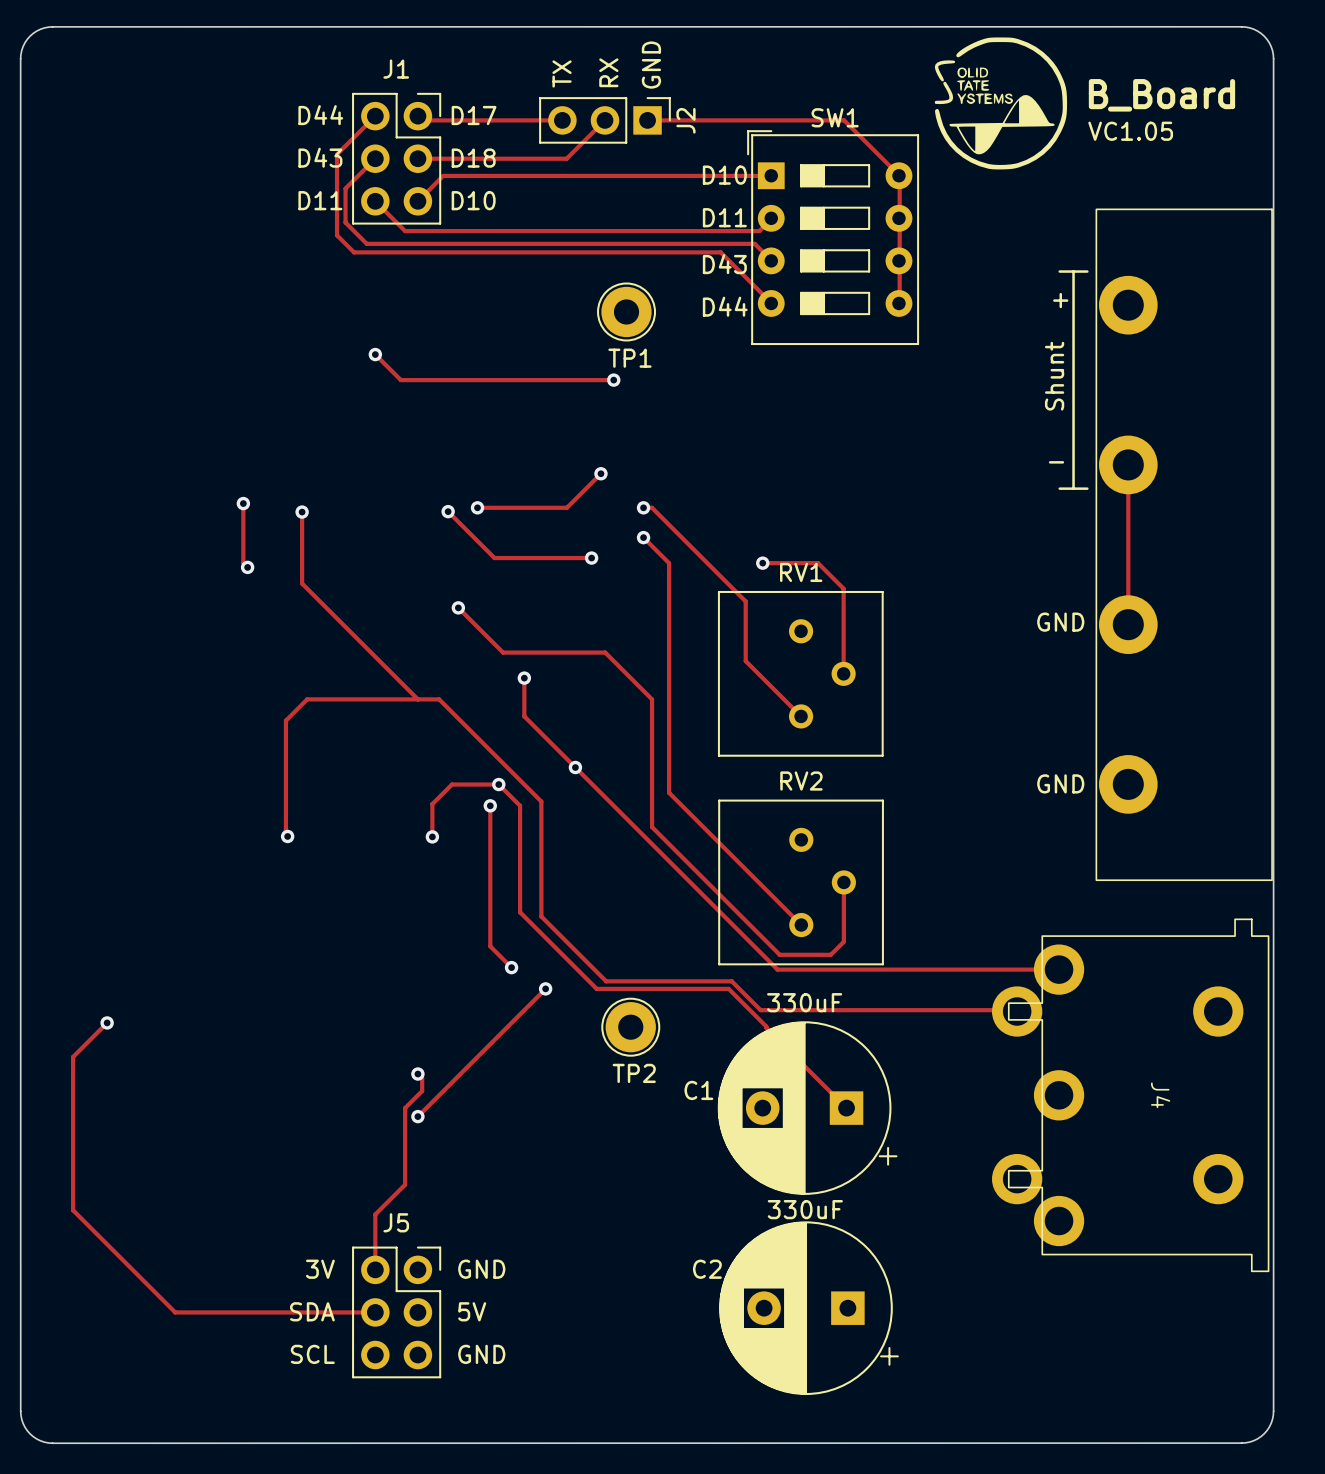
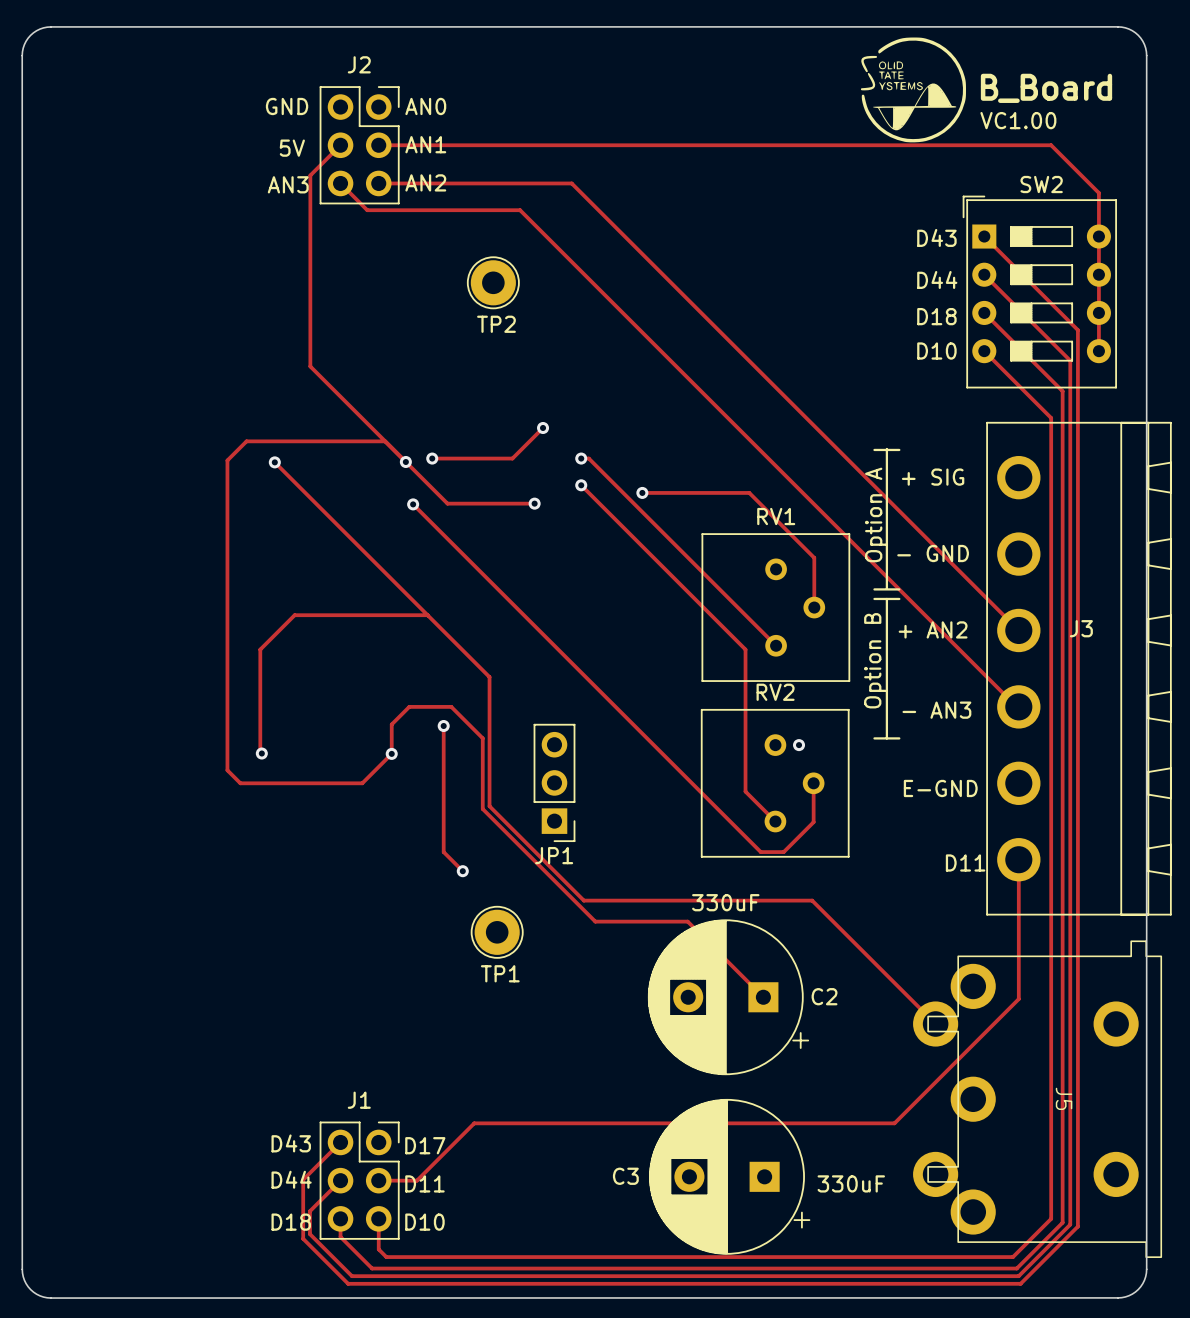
drawing shape: [934, 37, 1068, 170] -> [860, 37, 967, 143]
text rotation: 0° (651, 65) -> 90° clockwise (287, 106)
text position: GND (651, 65) -> GND (287, 106)
J1 name: J1 (396, 69) -> J2 (359, 64)
text: RX (608, 72) -> none
text: TX (562, 73) -> none
text: D44 (320, 115) -> none
text: D17 (474, 115) -> AN0 (425, 106)
track: (375, 116) (337, 154) (337, 235) (354, 252) (720, 252) (771, 303) -> none
track: (417, 116) (422, 120) (562, 120) -> none
track: (604, 120) (566, 158) -> (1098, 351) (1098, 193) (1051, 145) (512, 145)
J2: (604, 120) -> none
track: (647, 120) (844, 120) (899, 175) (899, 303) -> none
text: VC1.05 (1130, 131) -> VC1.00 (1018, 120)
text: D43 (320, 157) -> 5V (292, 148)
text: D18 (473, 158) -> AN1 (425, 144)
text: D10 (724, 175) -> none
track: (771, 175) (443, 175) (417, 201) -> (1018, 630) (571, 183) (378, 183)
track: (345, 188) (345, 222) (366, 243) (754, 243) (771, 261) -> (313, 172) (310, 175) (310, 366) (405, 461)
text: D11 (320, 200) -> AN3 (288, 184)
text: D10 (473, 200) -> AN2 (425, 182)
text: D11 (724, 217) -> none
track: (771, 218) (759, 231) (575, 231) -> (1018, 706) (520, 210)
SW1: (833, 237) -> none
text position: D43 (724, 264) -> D43 (936, 237)
line: (1059, 271) (1087, 271) -> (874, 589) (899, 589)
line: (1073, 271) (1073, 488) -> none
text: + (1060, 300) -> none
text position: D44 (725, 306) -> D44 (937, 279)
TP1 position: (626, 311) -> (497, 932)
SW2: none -> (1039, 292)
track: none -> (984, 312) (1062, 391) (1062, 1222) (1016, 1268) (372, 1268) (340, 1236) (340, 1218)
text: none -> D18 (936, 316)
track: (375, 354) (400, 380) (613, 380) -> none
via: (375, 354) -> none
text: Shunt (1054, 376) -> none
via: (613, 380) -> none
text: none -> D10 (936, 351)
track: none -> (984, 351) (1051, 418) (1051, 1218) (1012, 1257) (386, 1257) (378, 1249) (378, 1218)
text: - (1056, 462) -> none
track: (1128, 464) (1128, 624) -> none
track: none -> (385, 441) (246, 441) (227, 460) (227, 770) (240, 783) (362, 783) (391, 753)
line: (1059, 488) (1087, 488) -> (874, 449) (899, 449)
line: none -> (886, 449) (886, 588)
track: (243, 503) (243, 563) (247, 567) -> none
via: (243, 503) -> none
track: (302, 512) (302, 583) (417, 699) -> (274, 462) (489, 677) (489, 722)
text: none -> + SIG (933, 477)
part: (1184, 544) -> none
track: none -> (642, 492) (749, 492) (814, 557) (814, 607)
track: none -> (413, 504) (760, 852) (783, 852) (813, 822) (813, 783)
track: (669, 563) (669, 792) (801, 925) -> (604, 508) (745, 649) (745, 791) (775, 821)
track: (762, 563) (818, 563) (843, 588) (843, 673) -> none
via position: (762, 563) -> (642, 492)
via: (247, 567) -> none
text: none -> Option A (876, 514)
track: (745, 601) (745, 661) (801, 716) -> (672, 542) (776, 645)
track: (458, 607) (503, 652) (605, 652) (652, 699) (652, 827) (779, 954) (830, 954) (843, 941) (843, 882) -> none
via position: (458, 607) -> (413, 504)
text: GND (1060, 622) -> - GND (933, 553)
line: none -> (874, 598) (899, 598)
line: none -> (886, 598) (886, 738)
RV1 position: (800, 673) -> (775, 607)
track: (524, 678) (524, 716) (777, 969) (1059, 969) -> none
via: (524, 678) -> none
text: none -> + AN2 (933, 629)
track: (307, 699) (439, 699) (541, 801) -> (279, 630) (294, 615) (427, 615)
text: none -> Option B (875, 660)
J3: none -> (1078, 668)
via: (575, 767) -> none
text: GND (1060, 783) -> none
via: (498, 784) -> none
text: none -> - AN3 (936, 710)
track: (520, 805) (520, 912) (596, 988) (728, 988) (766, 1027) -> (470, 726) (482, 738) (482, 809) (595, 921) (687, 921) (691, 925)
line: none -> (874, 738) (899, 738)
via: none -> (799, 745)
JP1: none -> (554, 782)
text: none -> E-GND (940, 788)
RV2 position: (801, 882) -> (775, 783)
track: (541, 895) (541, 916) (606, 981) (731, 981) (760, 1010) (1017, 1011) -> (489, 806) (583, 900) (812, 900) (935, 1024)
track: none -> (1018, 859) (1018, 999) (894, 1123) (474, 1123) (416, 1180) (378, 1180)
text: none -> D11 (965, 862)
track: (545, 988) (417, 1116) -> none
via: (545, 988) -> none
track: (107, 1022) (73, 1057) (73, 1210) (175, 1312) (375, 1312) -> (984, 274) (1070, 360) (1070, 1224) (1018, 1276) (352, 1276) (309, 1234) (309, 1211) (340, 1180)
via: (107, 1022) -> none
TP2 position: (630, 1027) -> (493, 282)
track: (417, 1074) (422, 1078) (422, 1091) (405, 1108) (405, 1184) (375, 1214) (375, 1269) -> (984, 236) (1077, 330) (1077, 1226) (1020, 1283) (348, 1283) (303, 1238) (303, 1179) (340, 1142)
via: (417, 1074) -> none
C1 name: C1 (698, 1090) -> C2 (824, 996)
J4: (1130, 1095) -> none
via: (417, 1116) -> none
C2 value position: 330uF (805, 1209) -> 330uF (851, 1183)
J5: none -> (1037, 1099)
J5 name: J5 (396, 1222) -> J1 (359, 1100)
text: 3V (320, 1269) -> D43 (291, 1143)
text: GND (481, 1269) -> D17 (425, 1145)
C2 name: C2 (707, 1269) -> C3 (625, 1176)
text: SDA (312, 1311) -> D44 (291, 1179)
text: 5V (472, 1311) -> D11 (424, 1183)
text: SCL (312, 1354) -> D18 (291, 1222)
text: GND (481, 1354) -> D10 (424, 1222)

